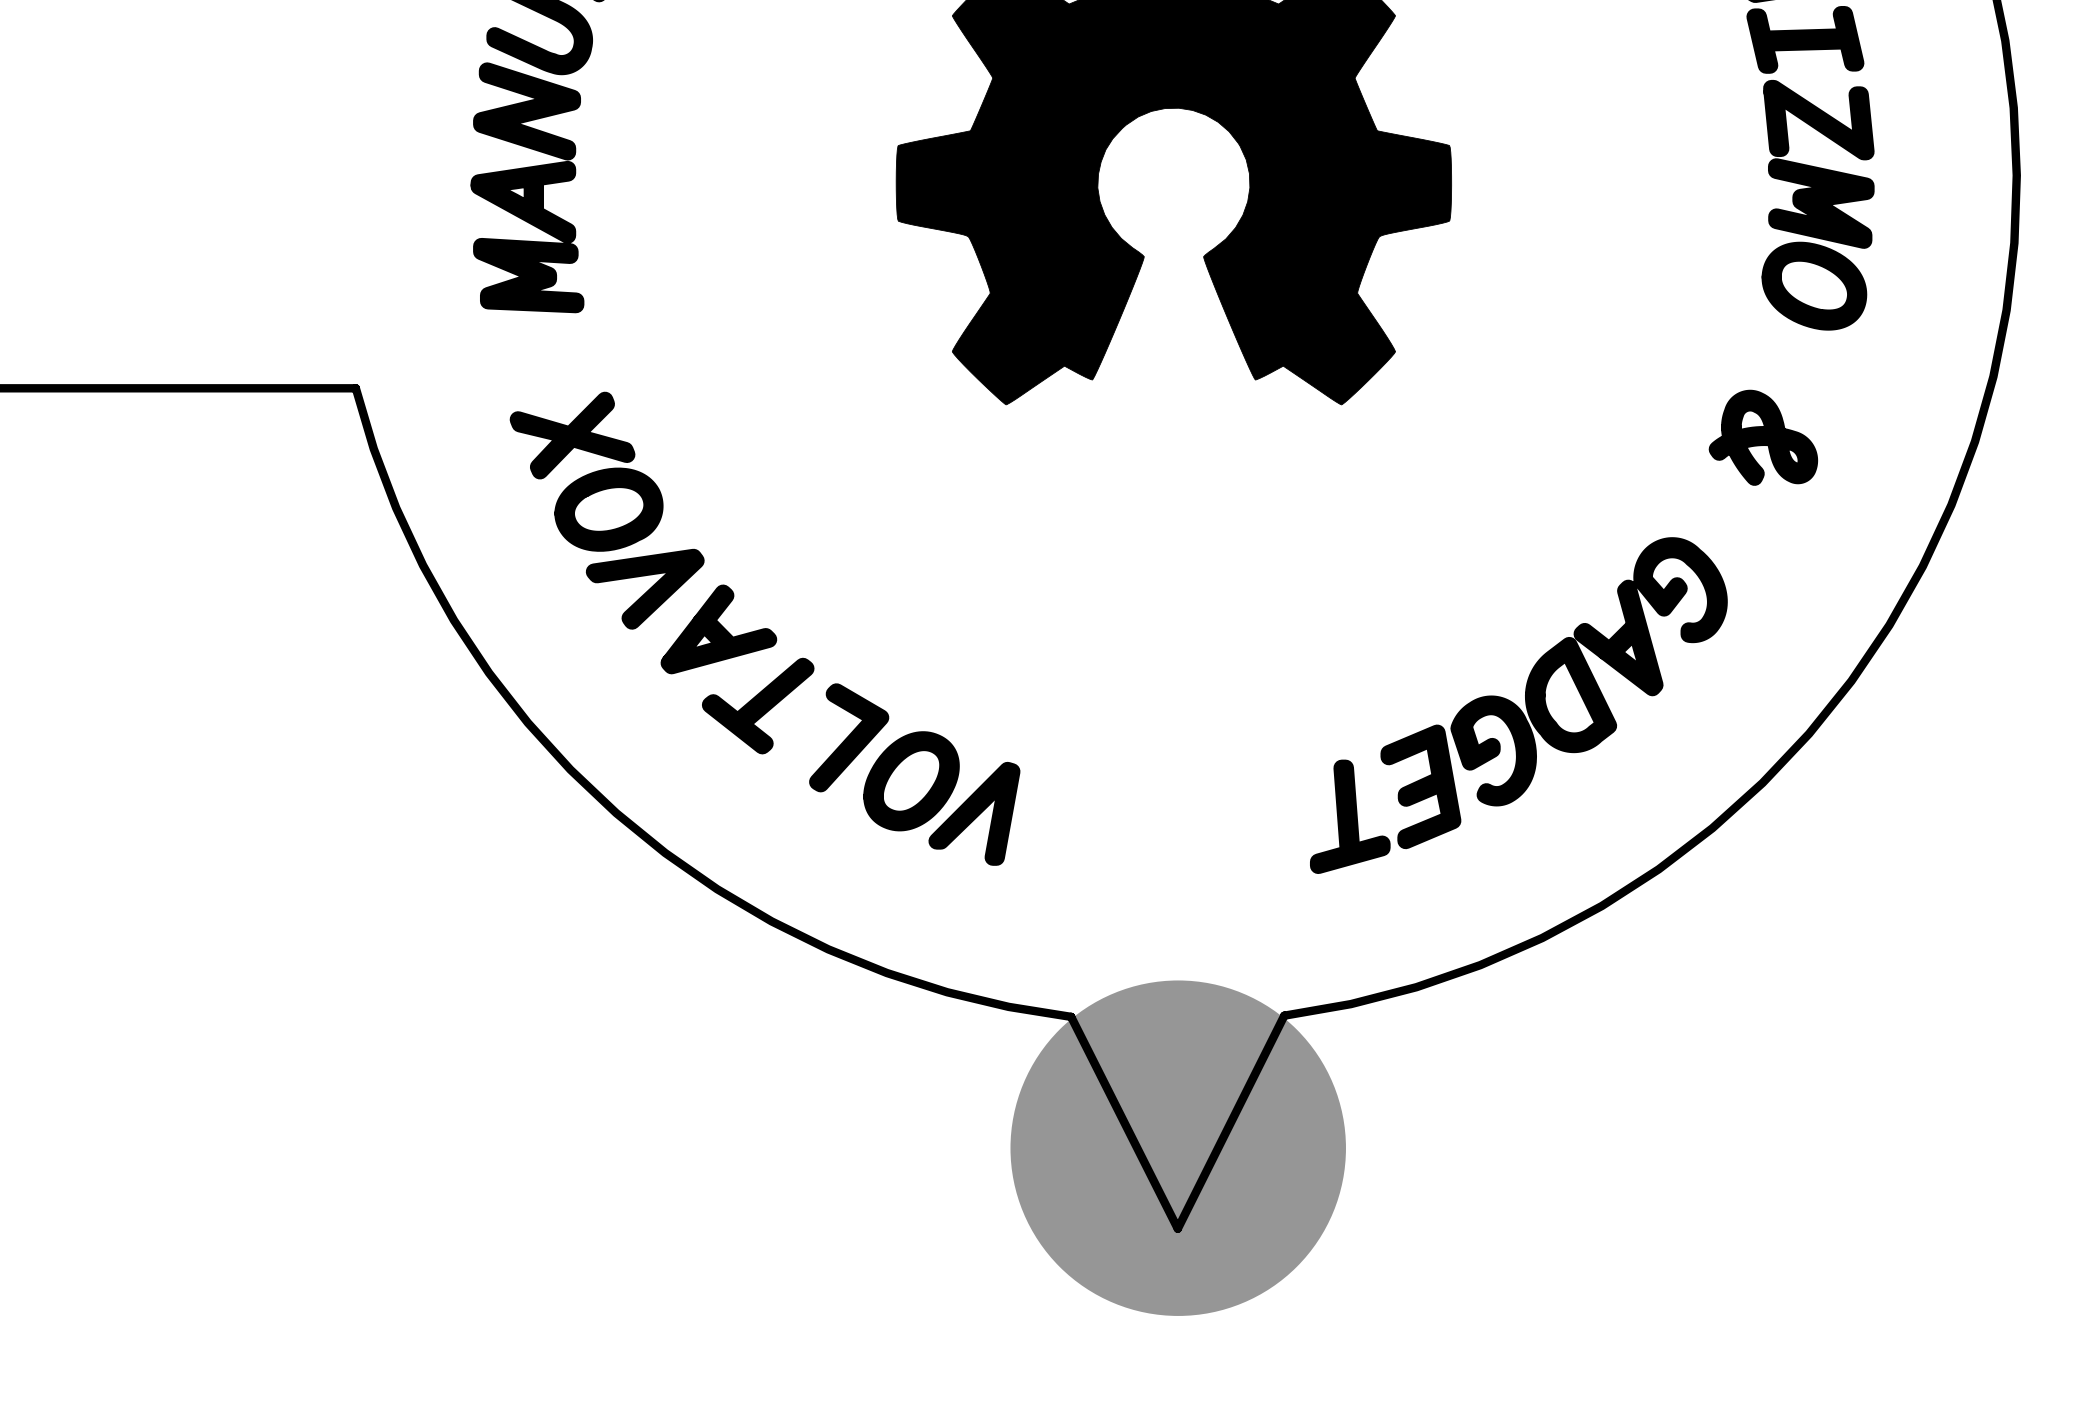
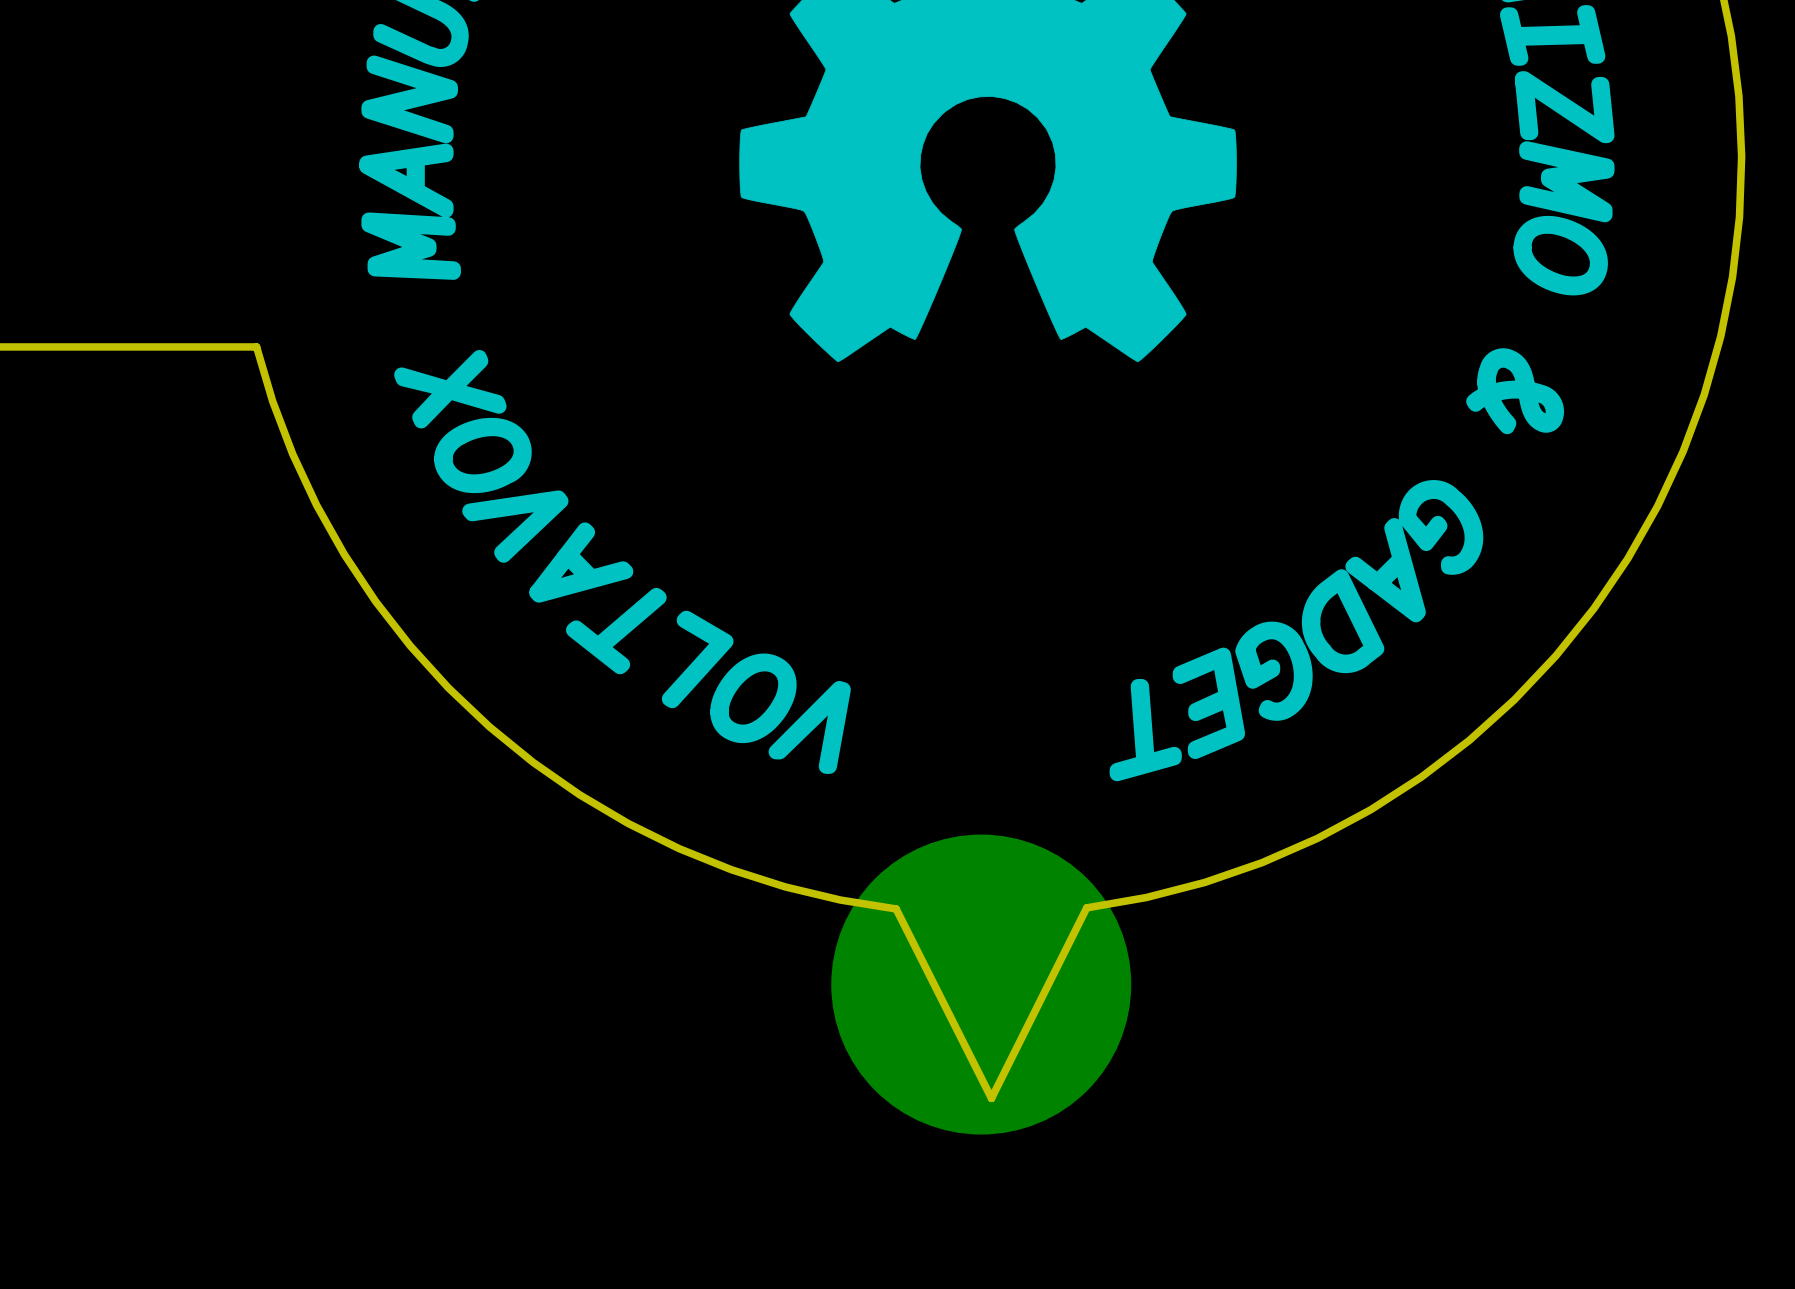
part position: (1178, 1148) -> (981, 984)

